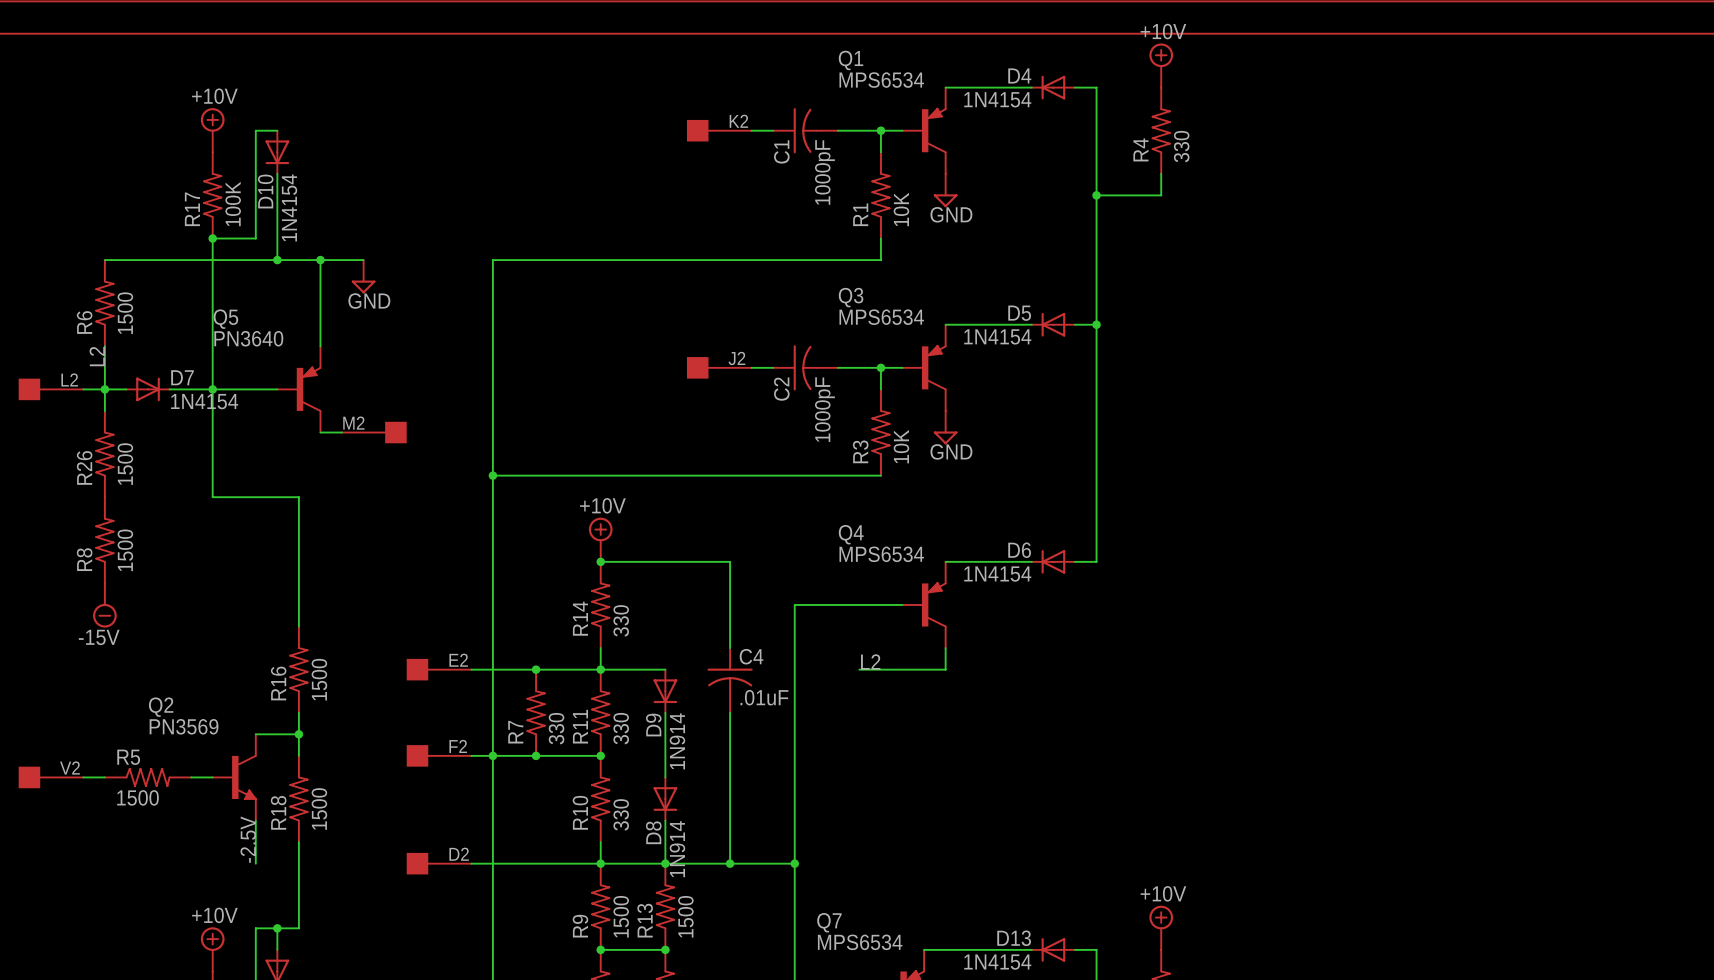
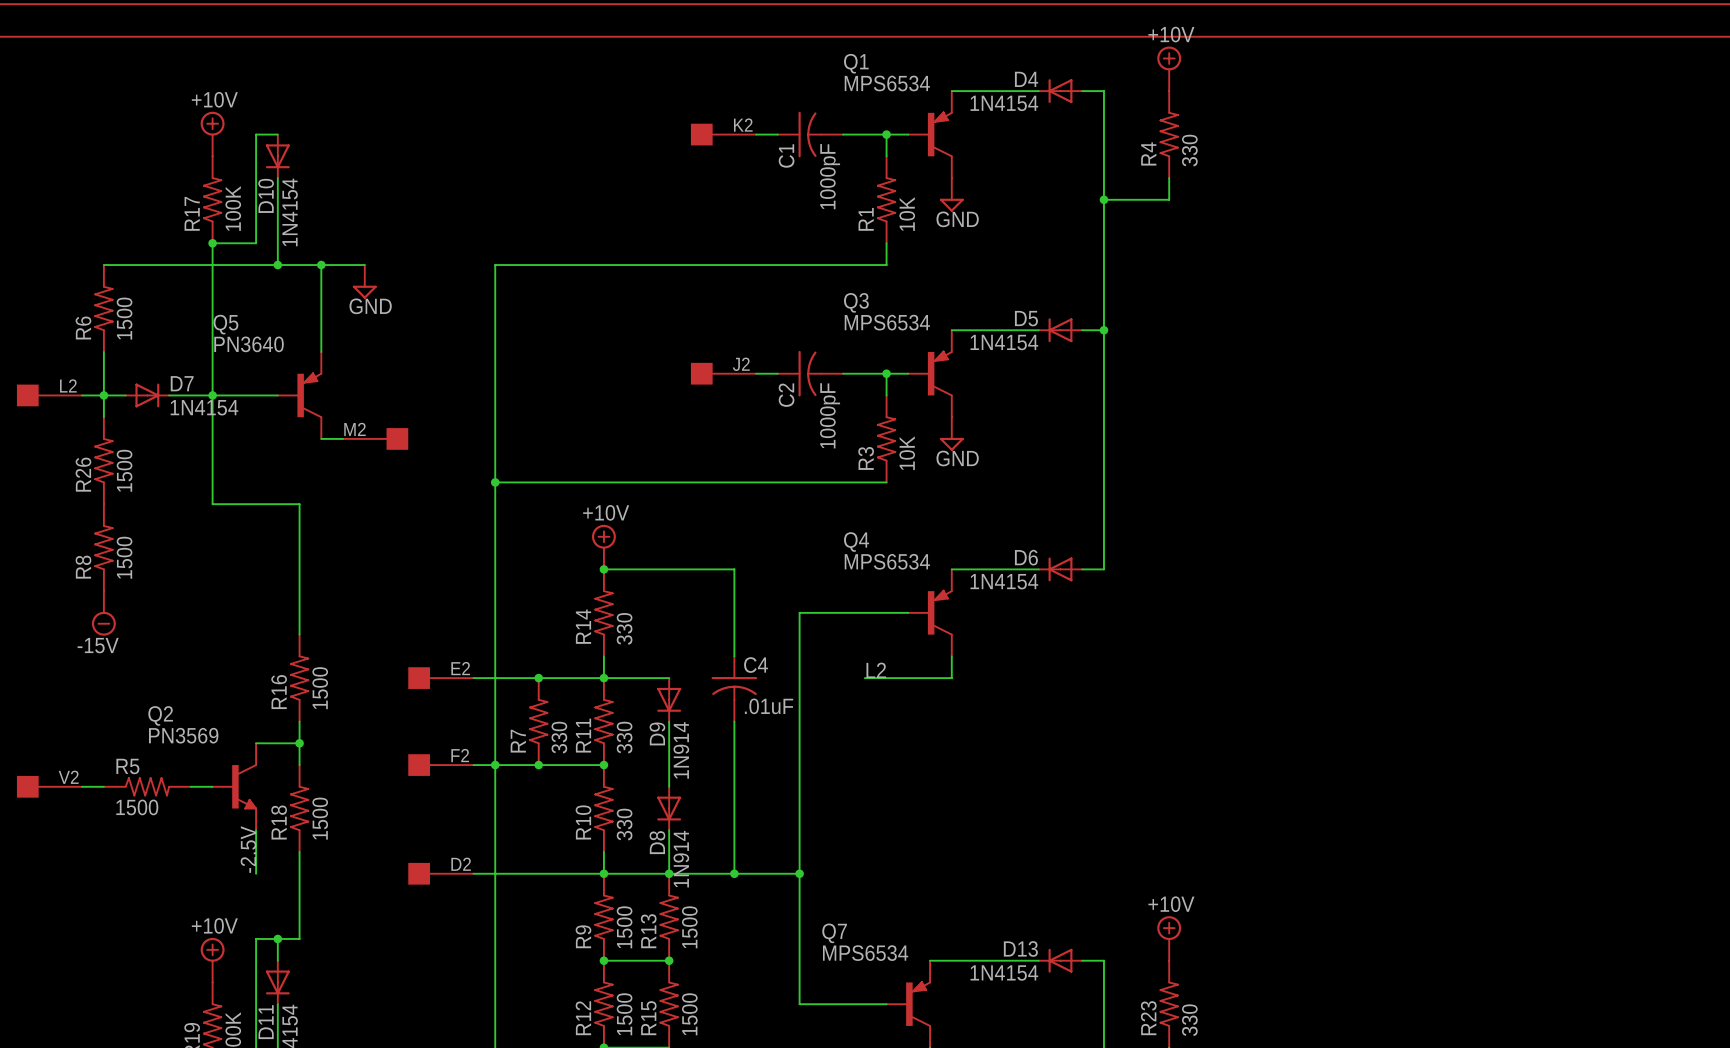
label: L2 (97, 356) -> none

